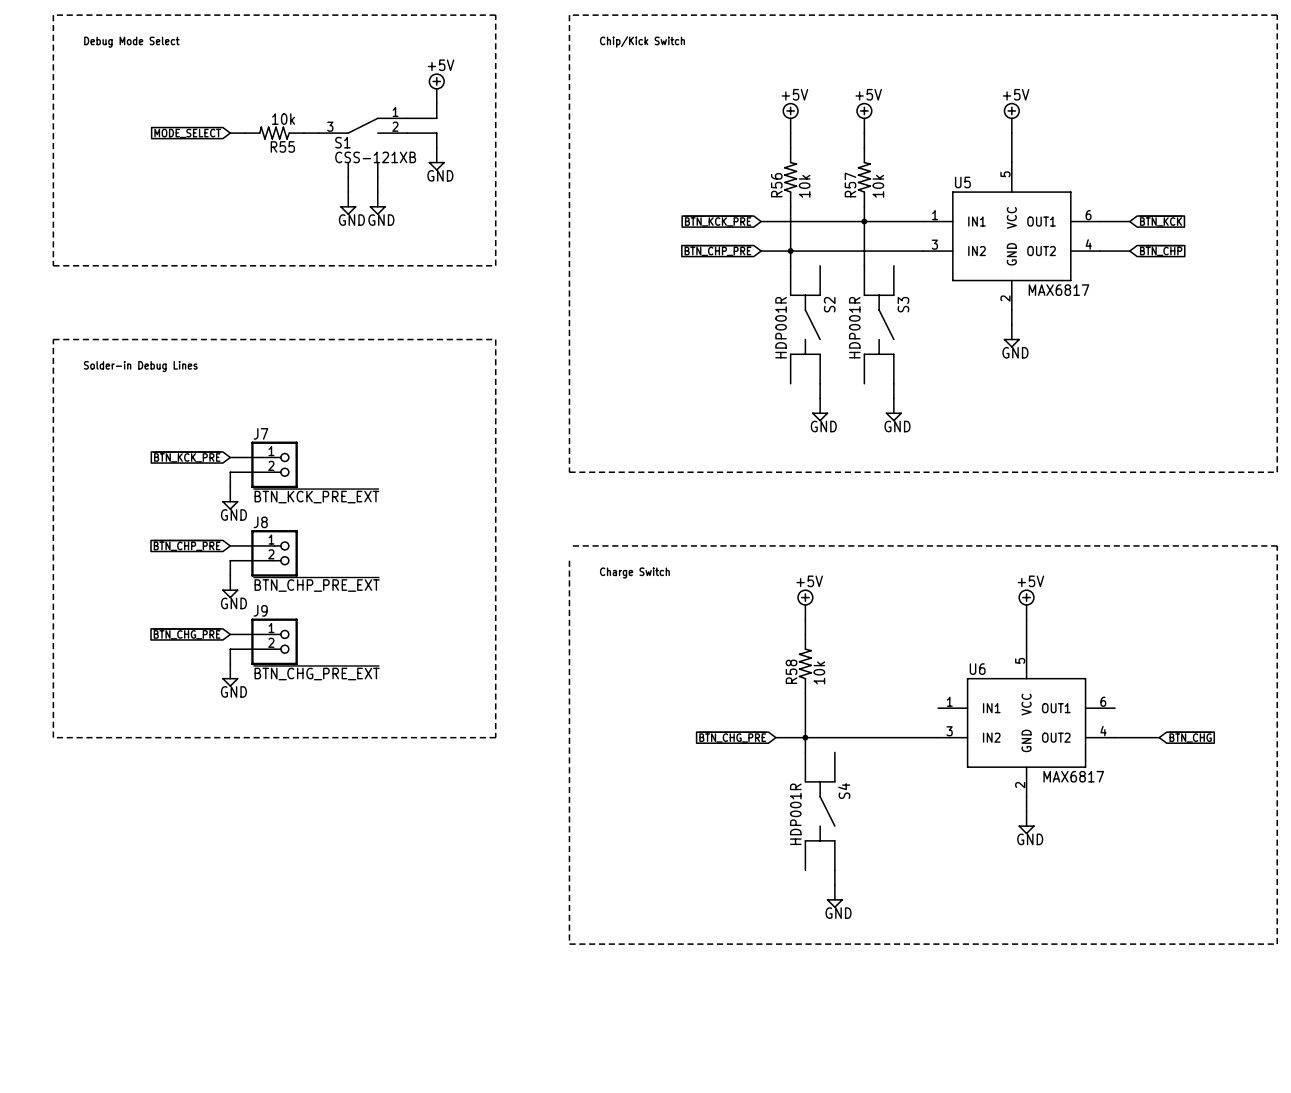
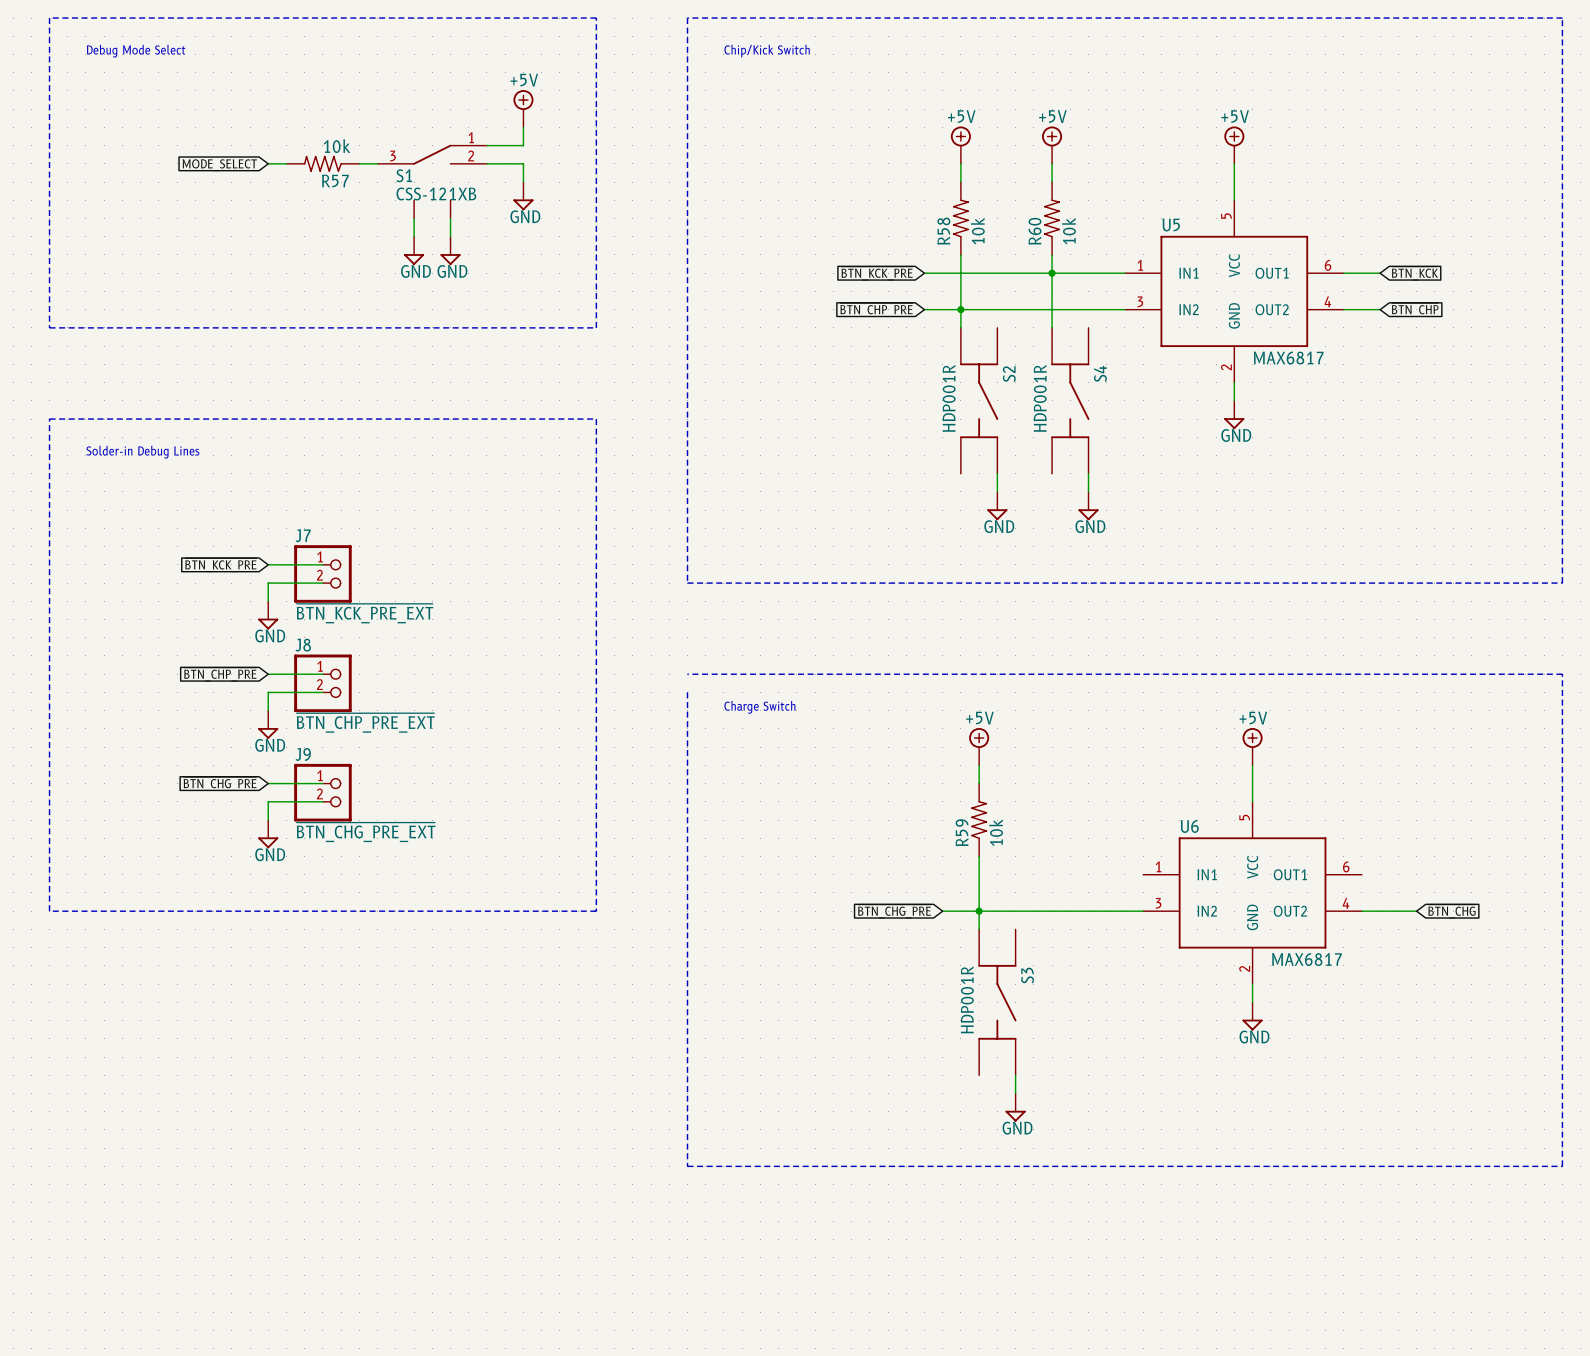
R55 name: R55 (282, 146) -> R57 (335, 181)
R57 name: R57 (850, 184) -> R60 (1035, 231)
R56 name: R56 (776, 185) -> R58 (943, 231)
S3 name: S3 (903, 304) -> S4 (1100, 373)
R58 name: R58 (791, 671) -> R59 (962, 832)
S4 name: S4 (844, 791) -> S3 (1027, 975)

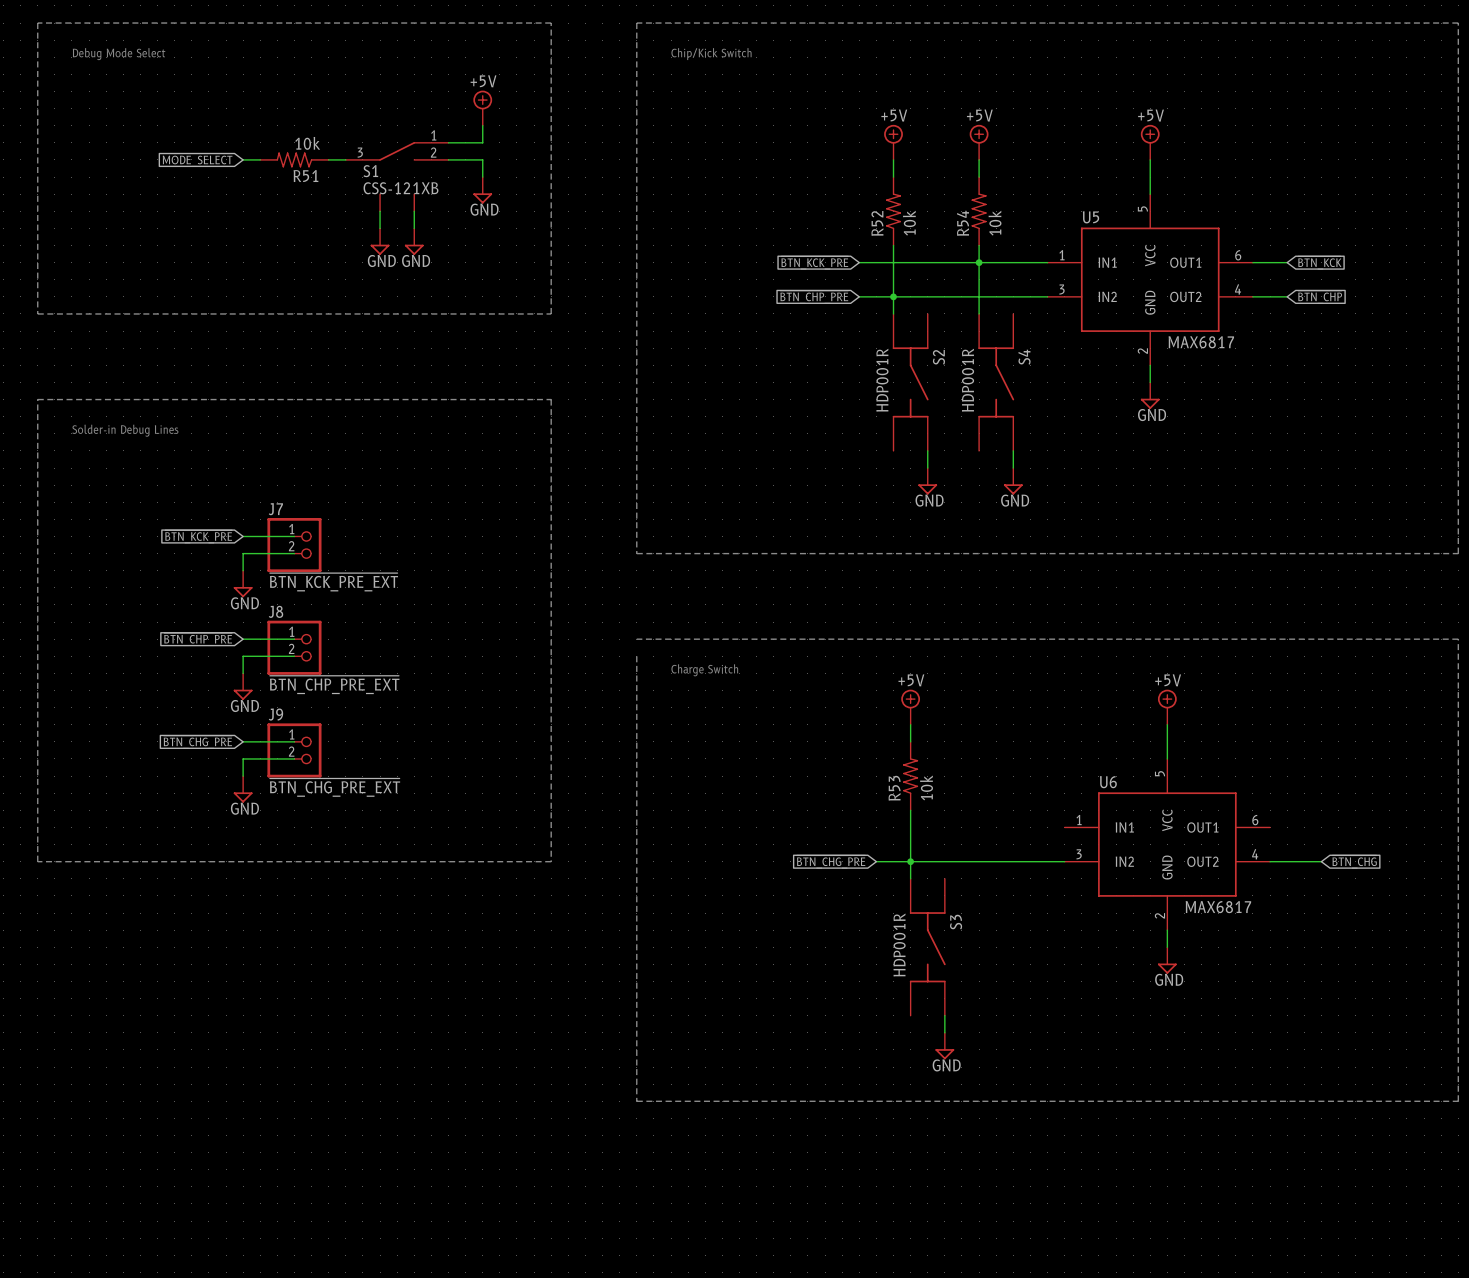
R57 name: R57 (335, 181) -> R51 (305, 176)
R58 name: R58 (943, 231) -> R52 (877, 223)
R60 name: R60 (1035, 231) -> R54 (963, 223)
R59 name: R59 (962, 832) -> R53 (894, 788)

